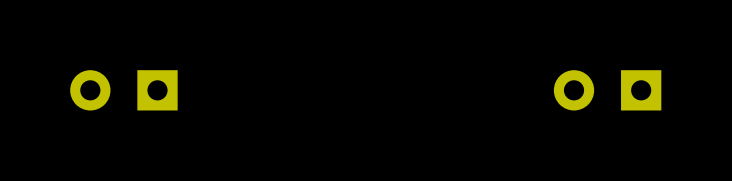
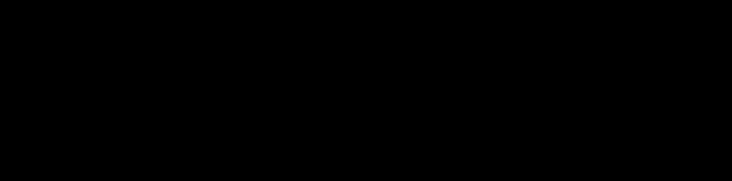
part: (123, 90) -> none
part: (607, 90) -> none

